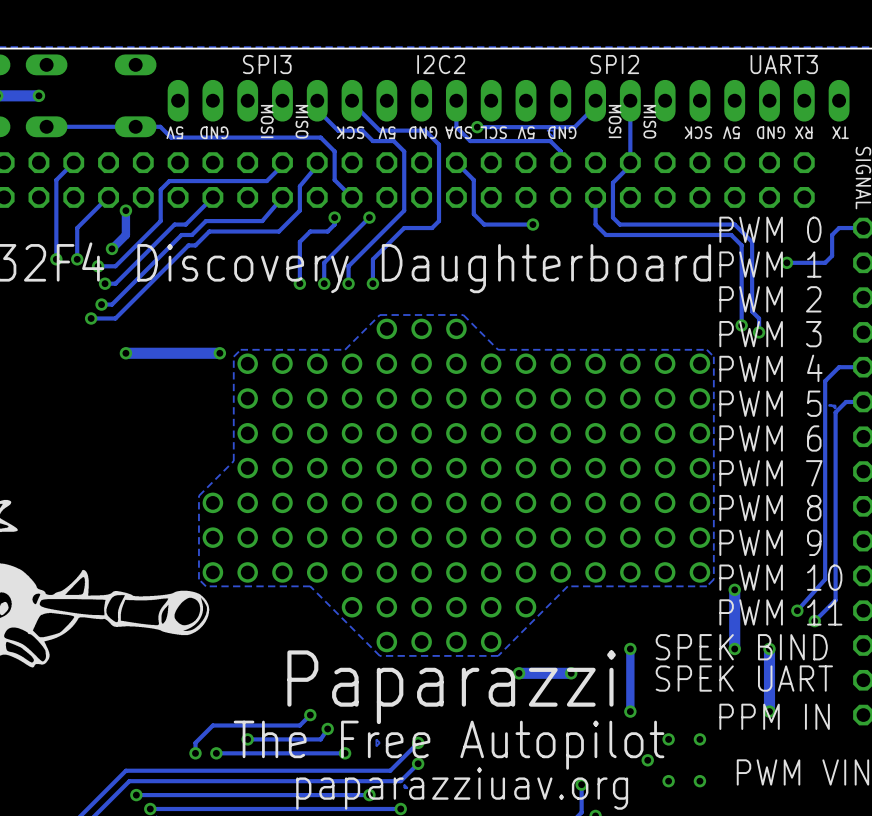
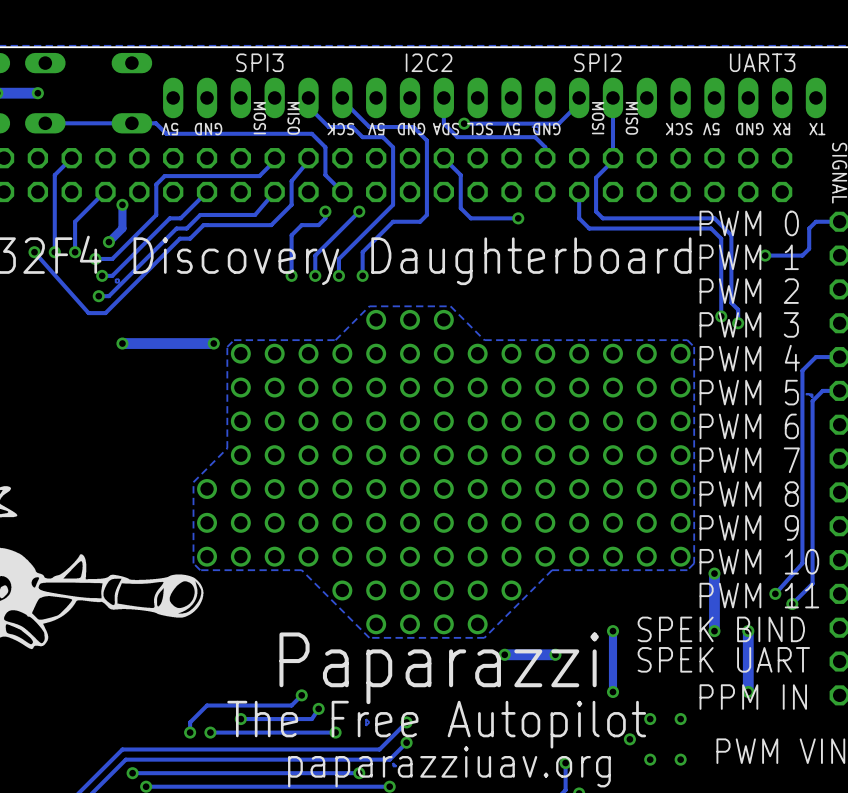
track: (188, 245) (115, 318) (91, 318) -> (183, 238) (179, 238) (105, 313) (88, 313) (34, 252)
zone outline: none -> (119, 279) (119, 282) (115, 282) (115, 279) (119, 279)
via position: (91, 318) -> (34, 252)

